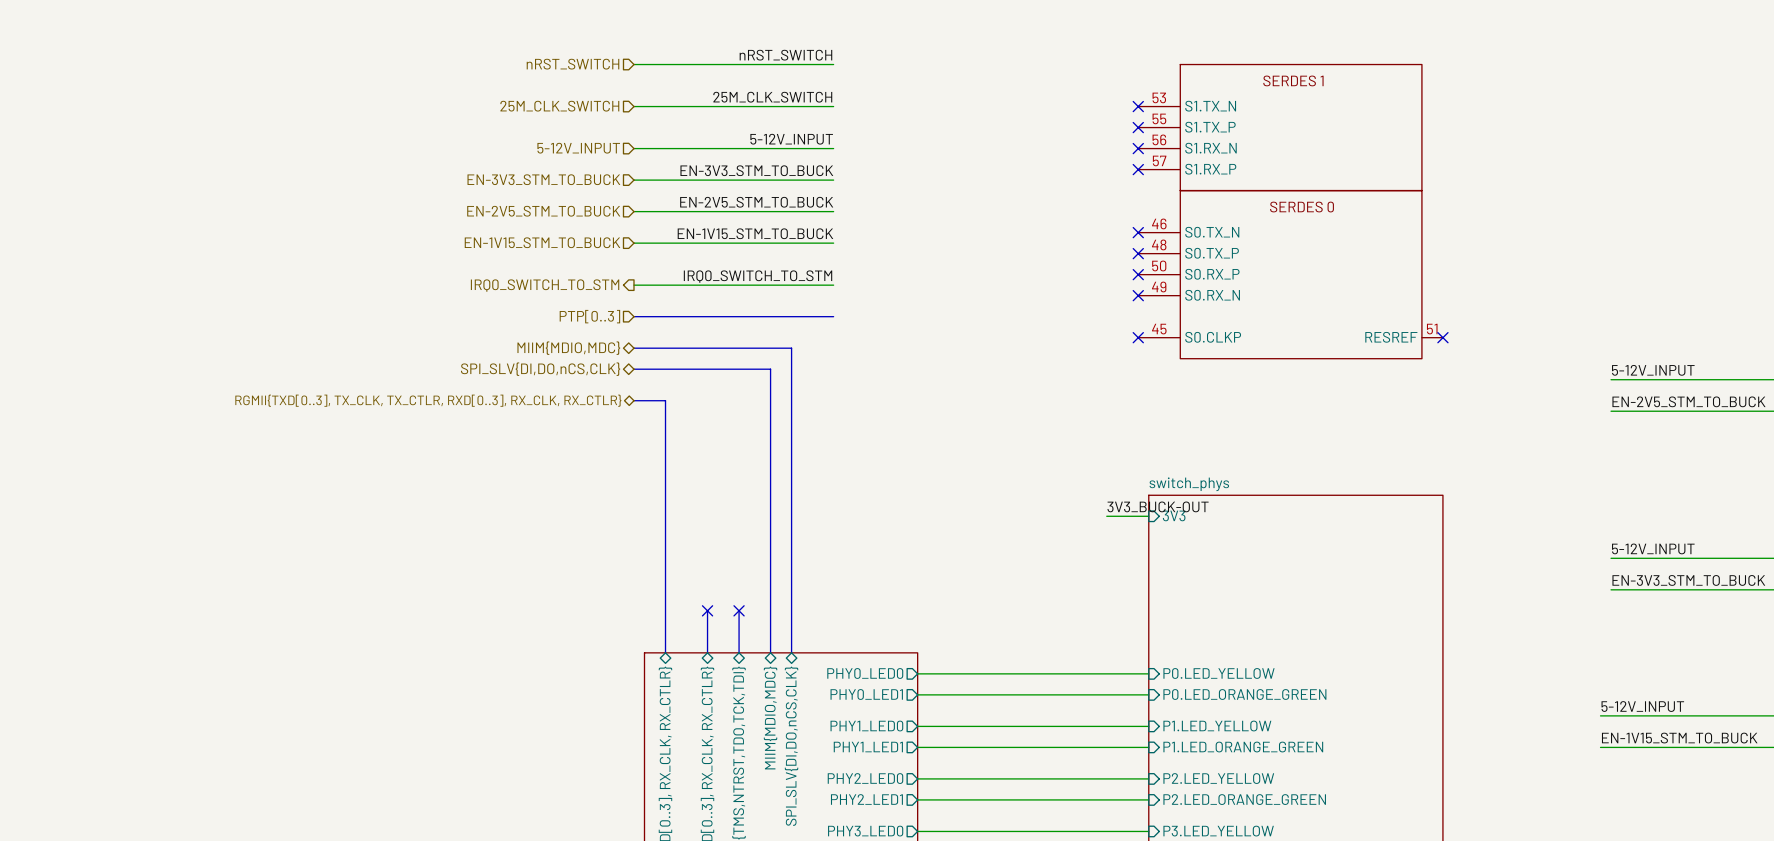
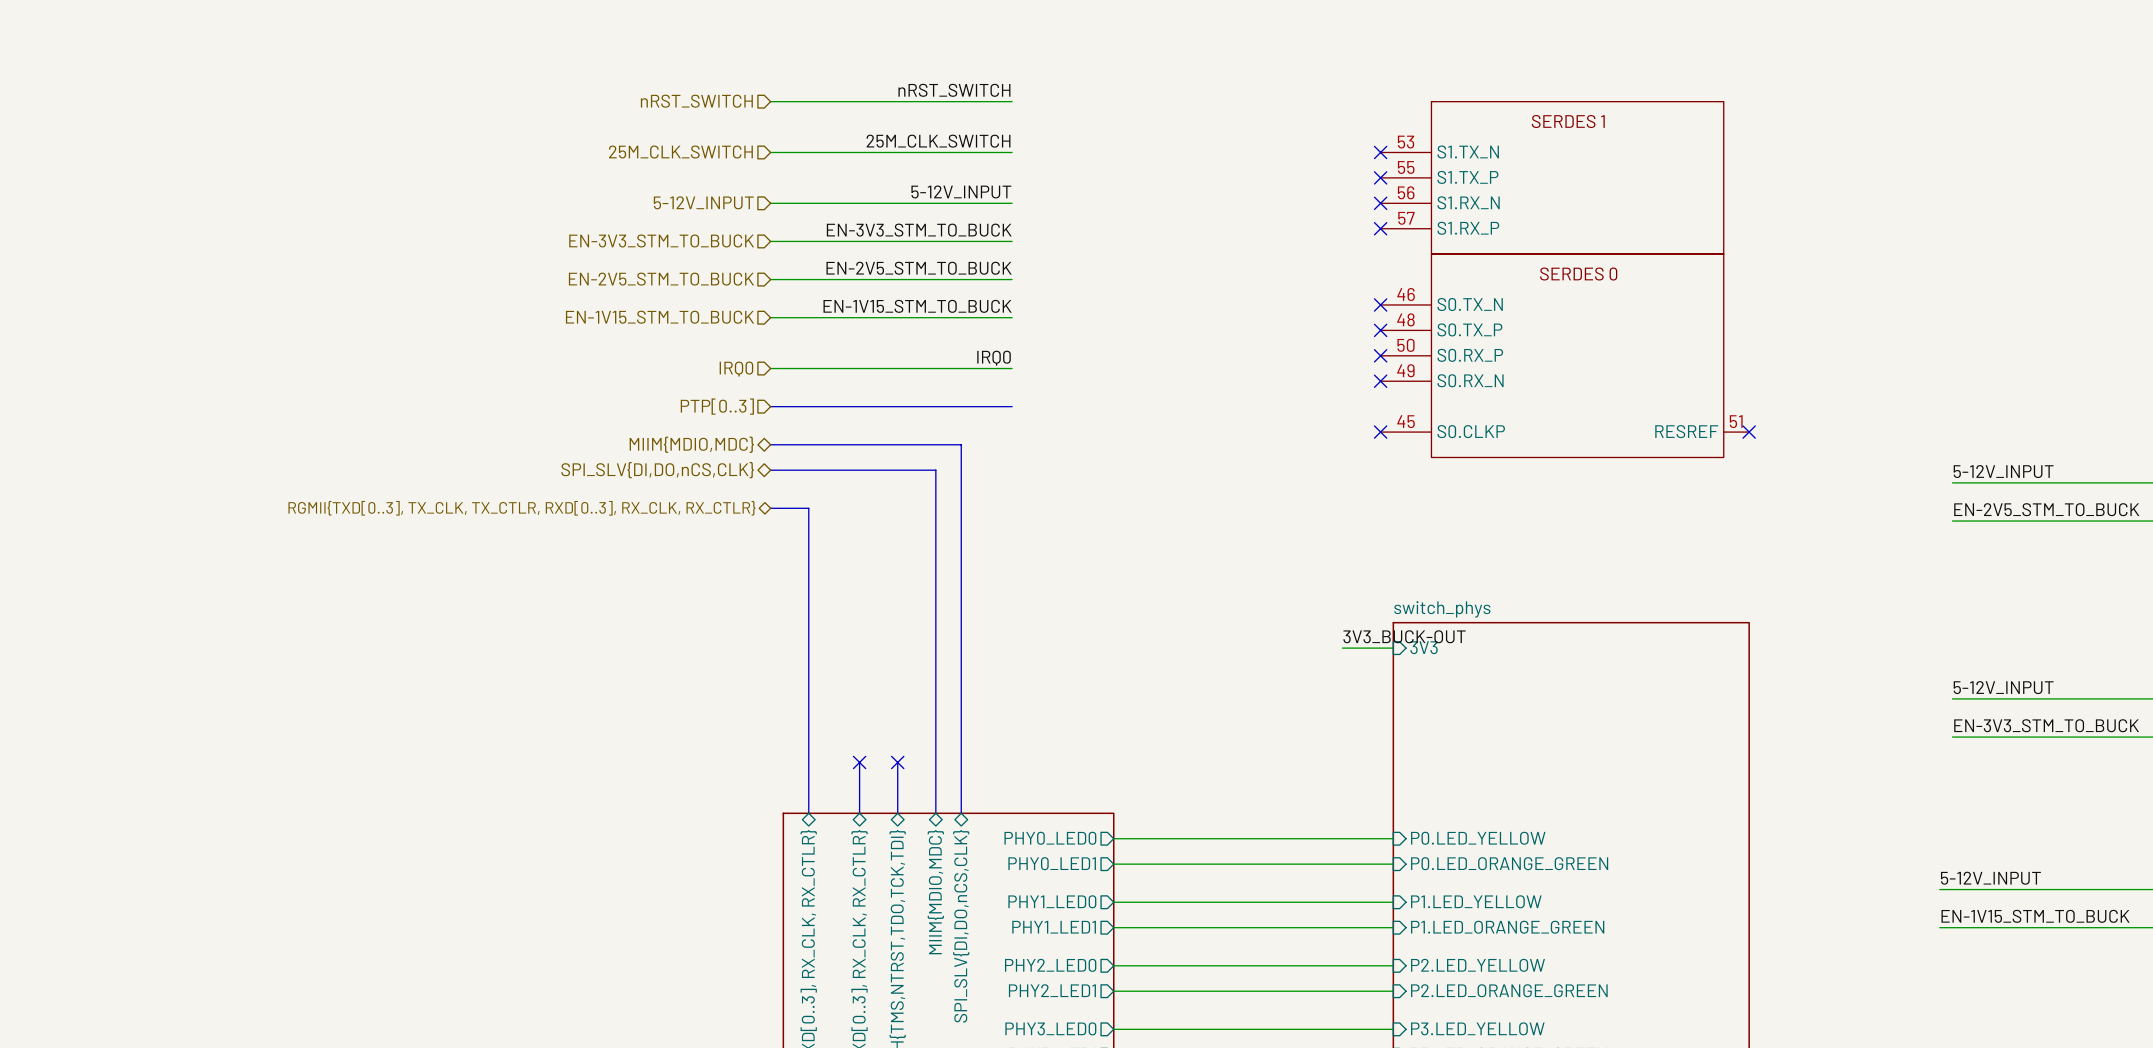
label: IRQ0_SWITCH_TO_STM (758, 276) -> IRQ0 (994, 358)
hierarchical label shape: output (545, 285) -> input (736, 369)
hierarchical label: IRQ0_SWITCH_TO_STM (545, 285) -> IRQ0 (736, 369)

